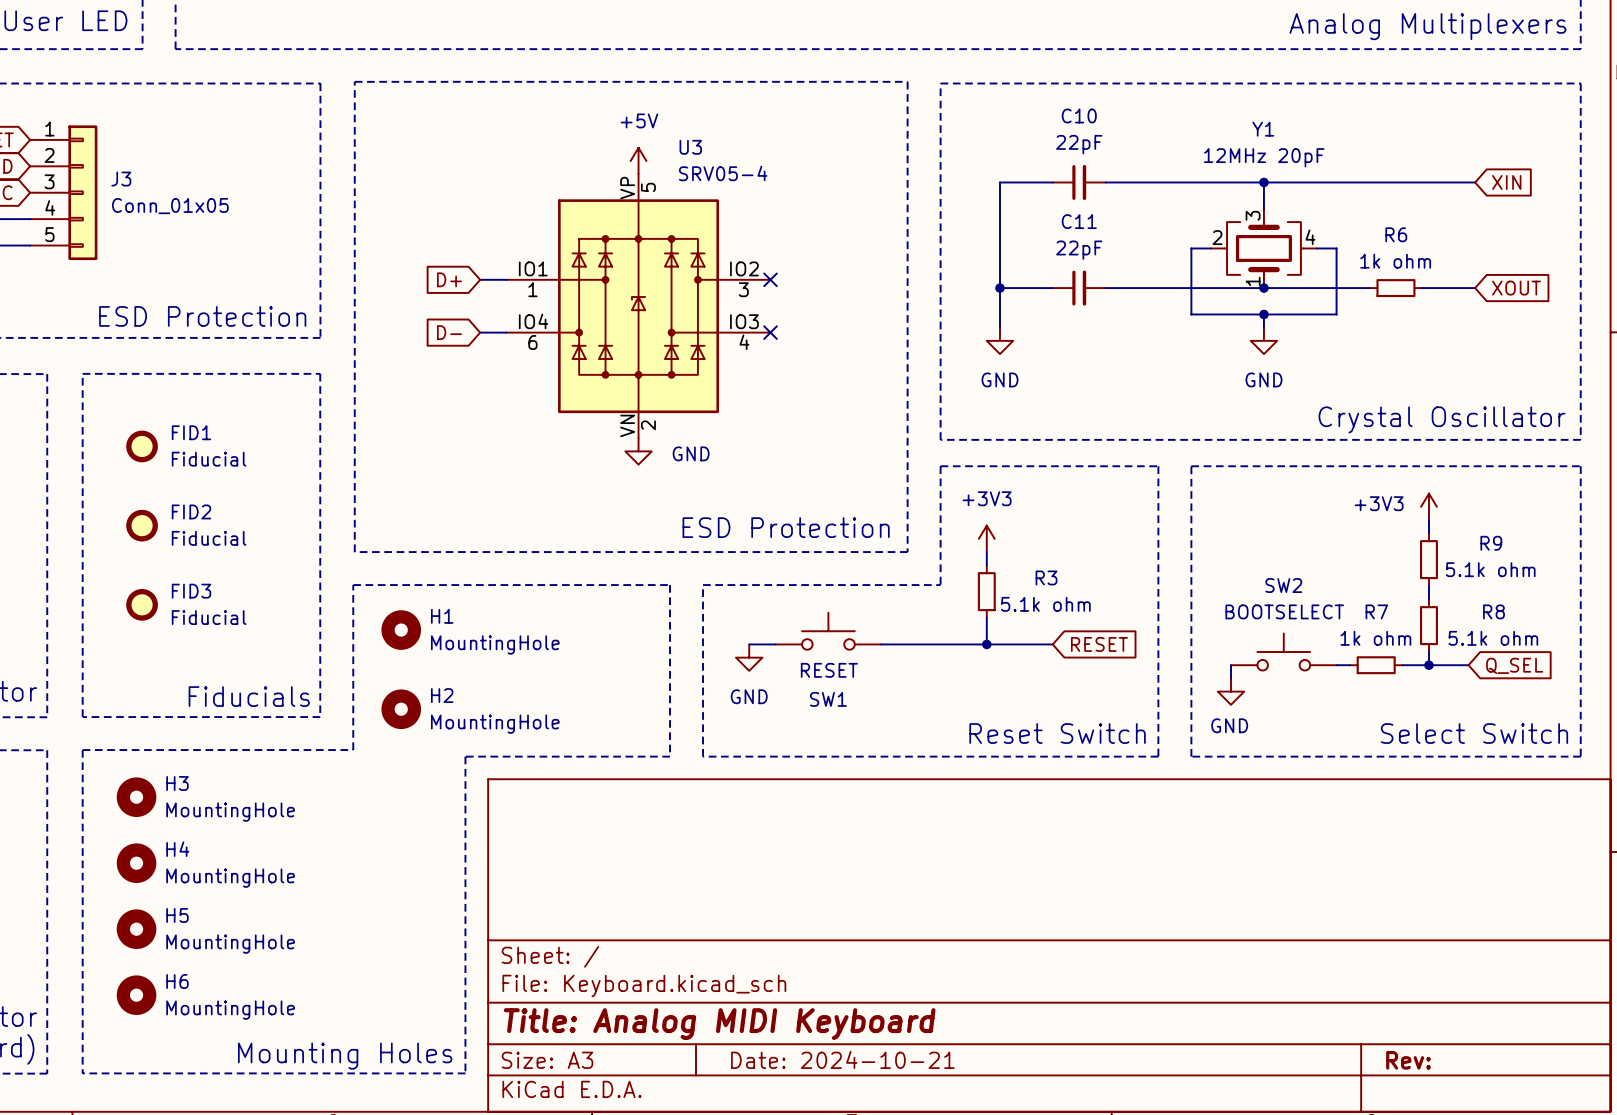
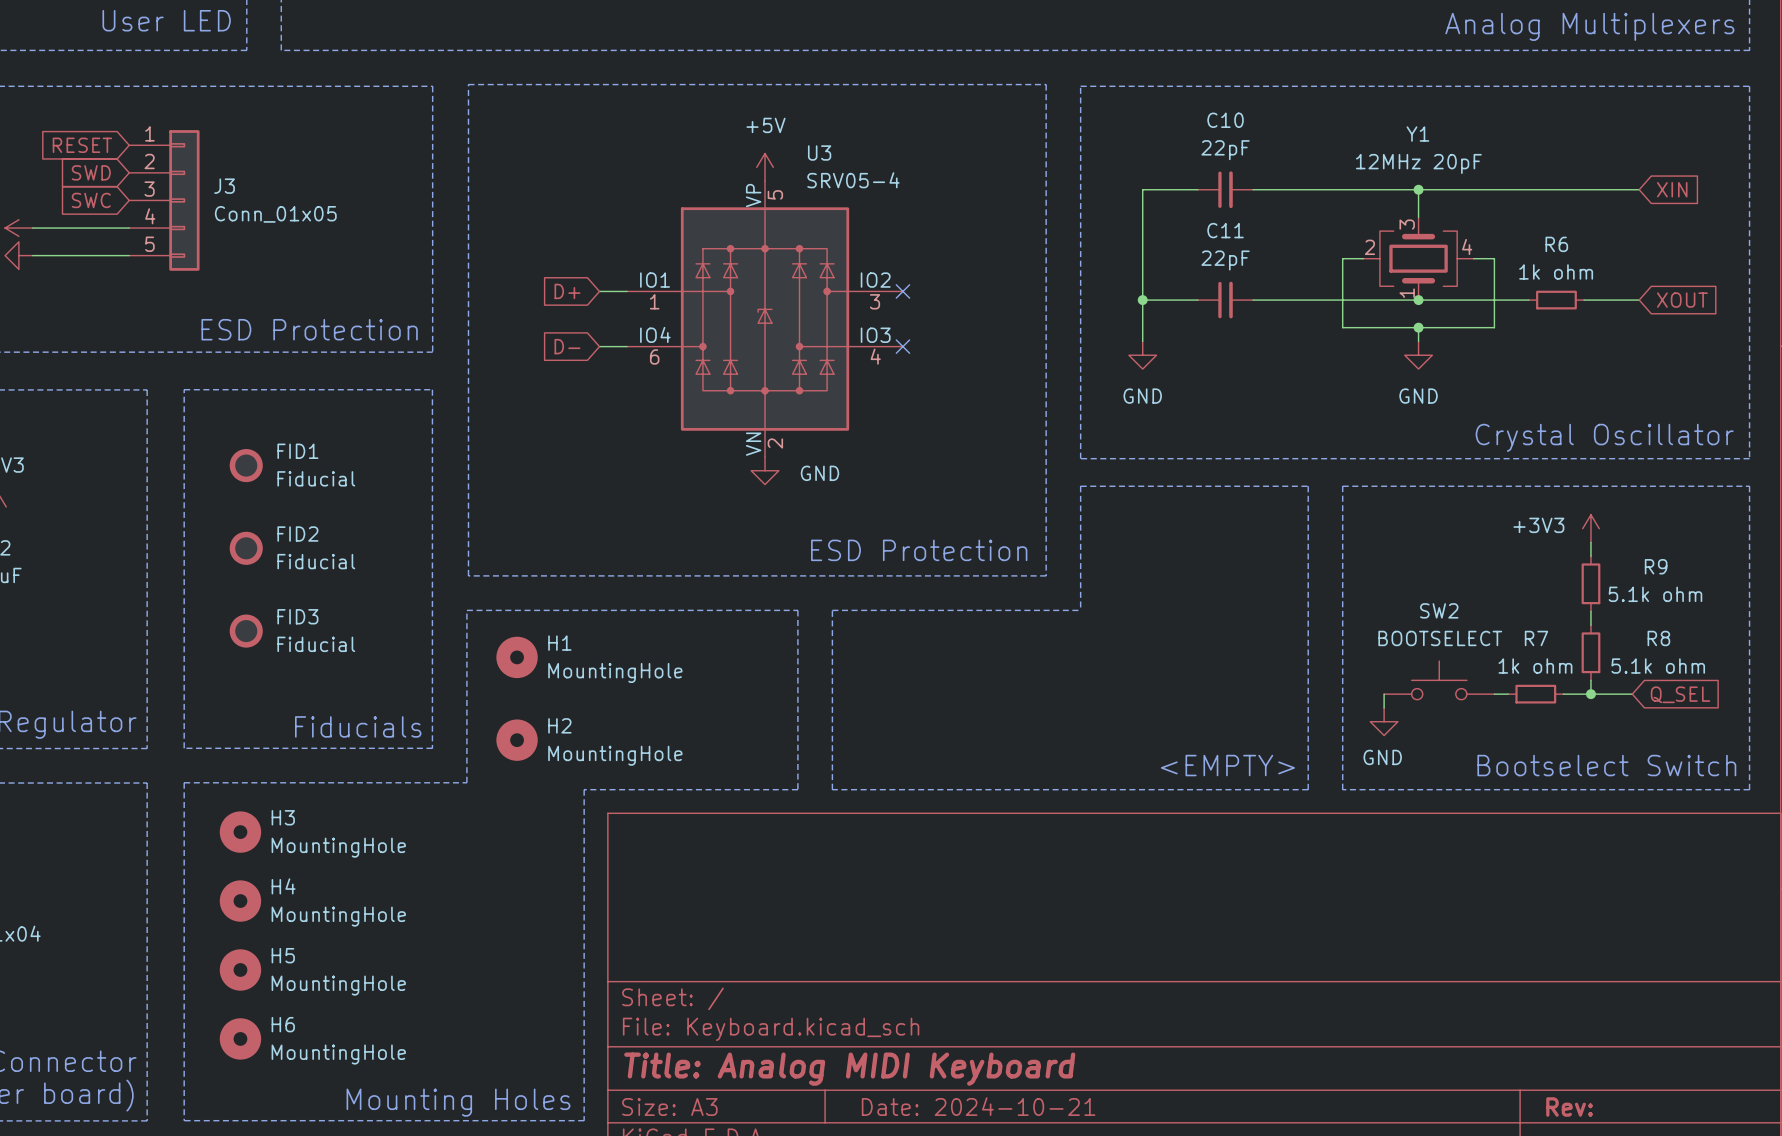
power symbol: +3V3 (986, 538) -> none
wire: (986, 552) (986, 565) -> none
R3: 5.1k ohm (986, 591) -> none
wire: (986, 618) (986, 644) -> none
SW1: RESET (828, 631) -> none
wire: (749, 644) (775, 644) -> none
wire: (881, 644) (1052, 644) -> none
junction: (986, 644) -> none
global label: RESET (1099, 644) -> none
power symbol: GND (749, 657) -> none
text: Reset Switch (1057, 733) -> <EMPTY> (1227, 765)
text: Select Switch (1474, 733) -> Bootselect Switch (1606, 765)

